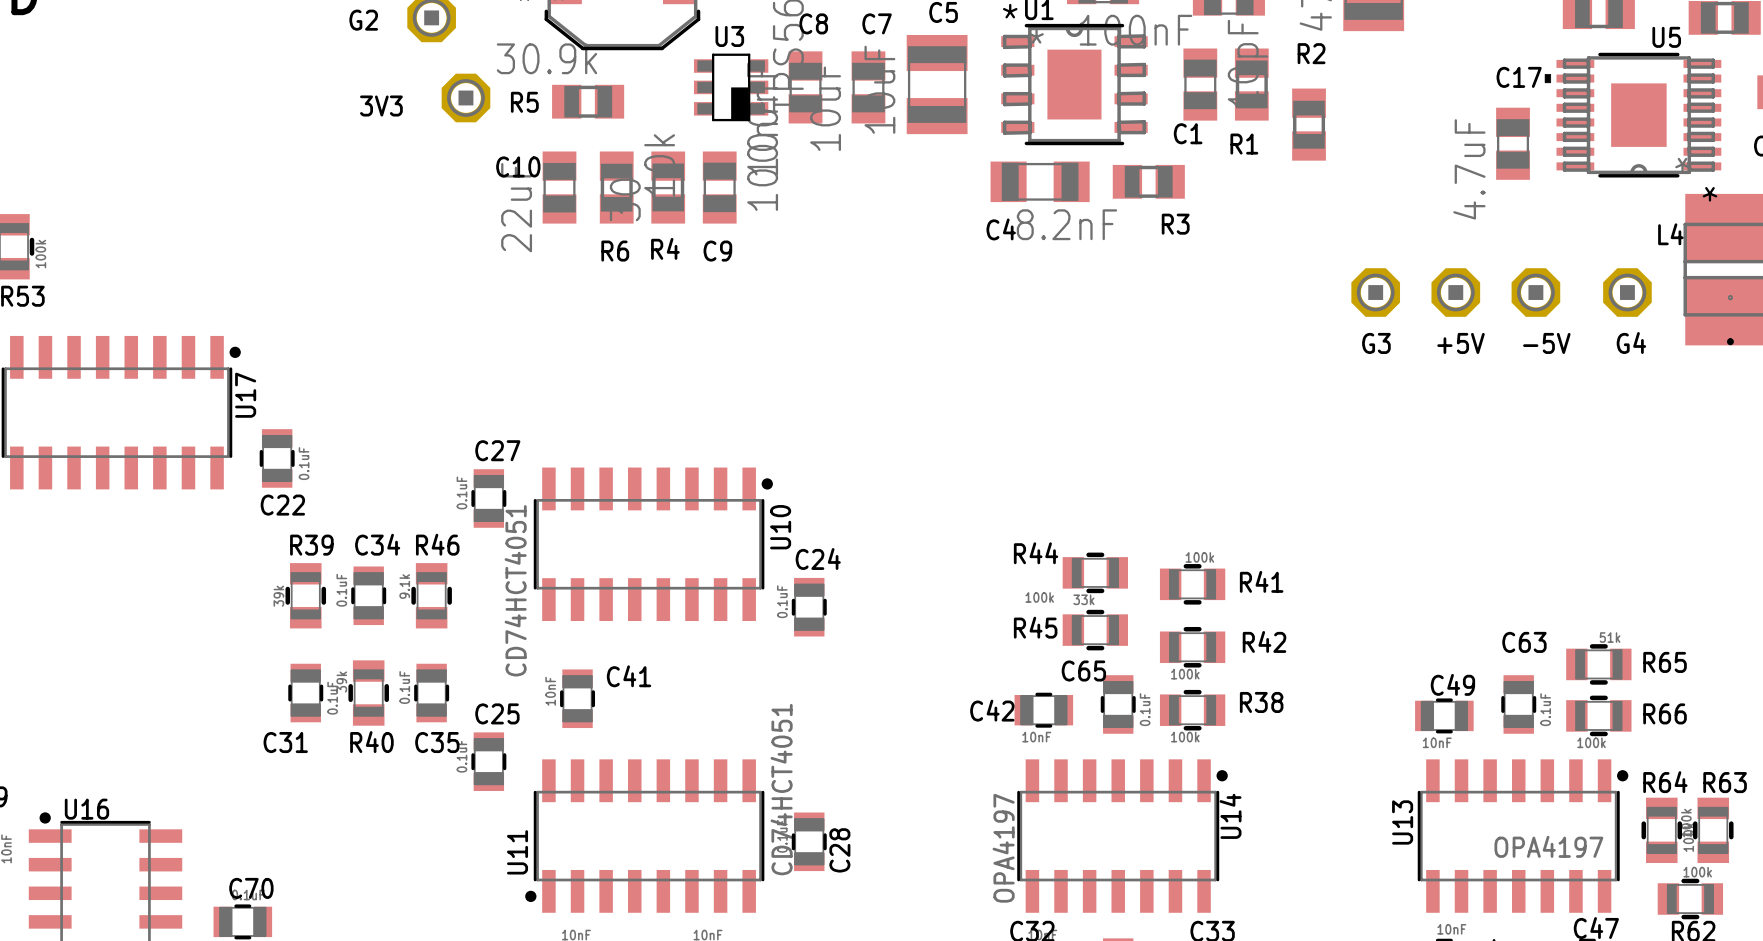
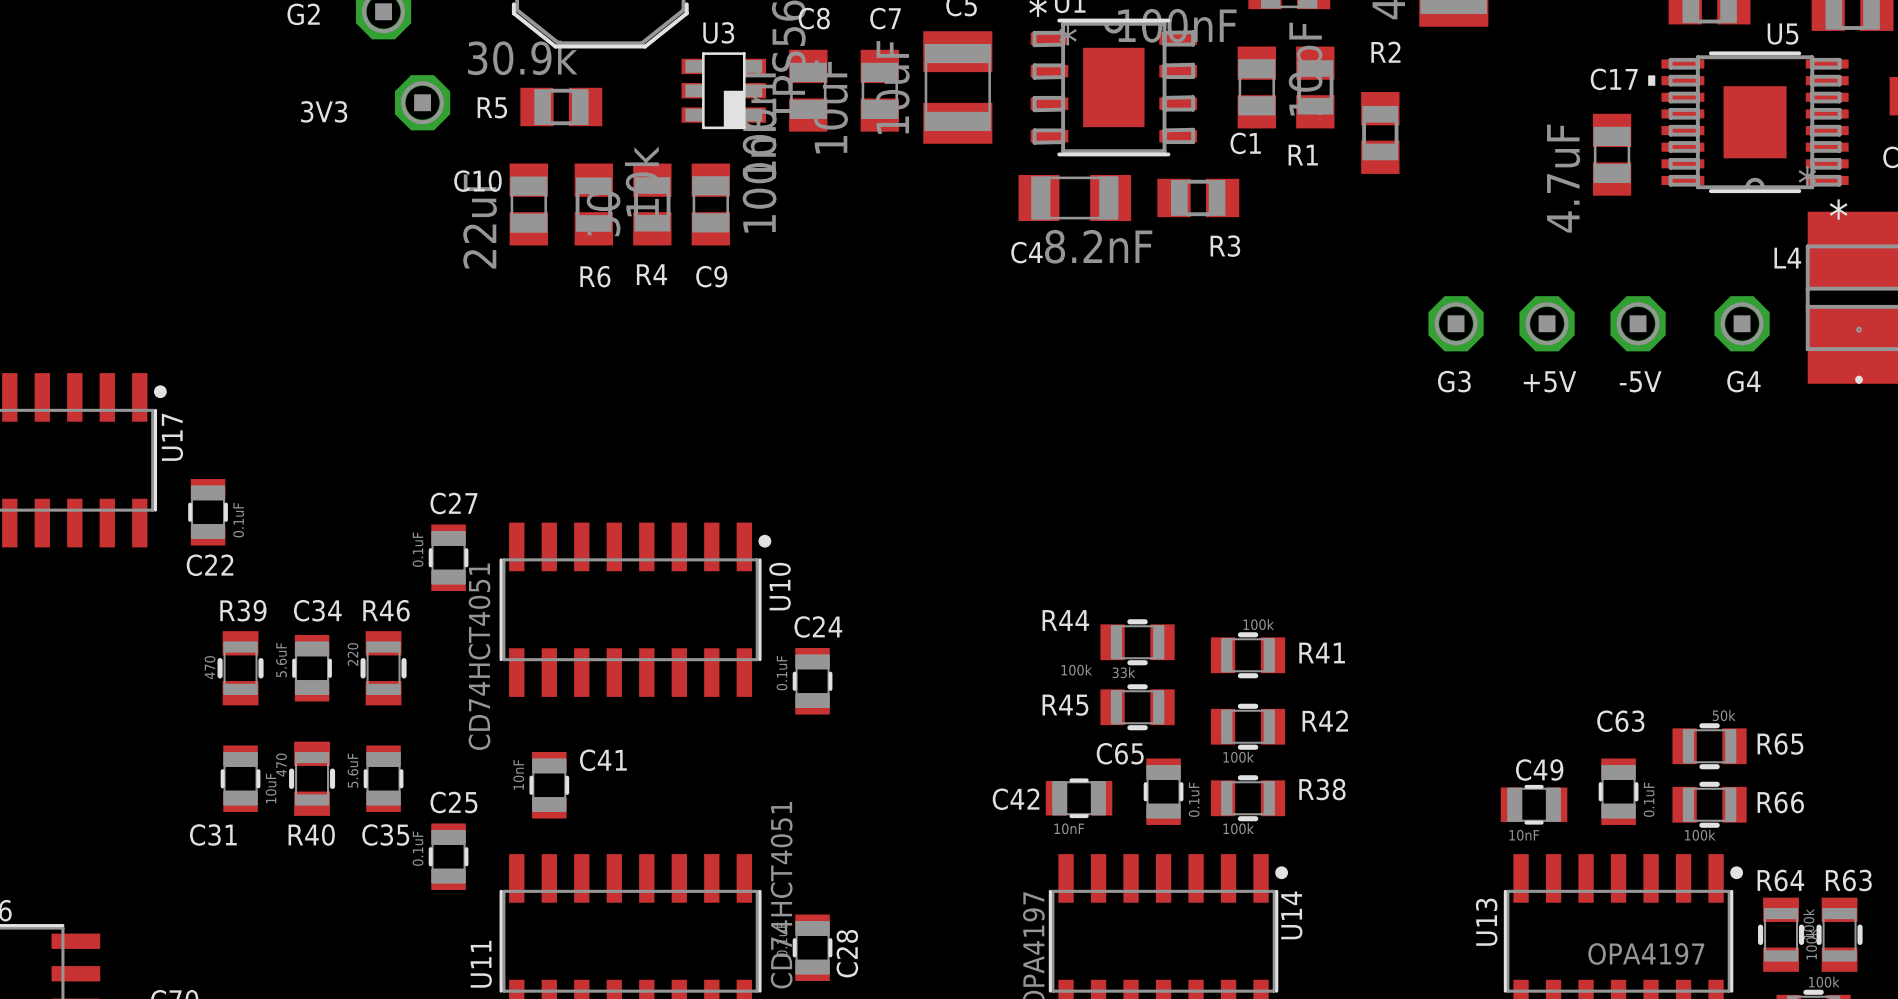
R46 value: 9.1k (404, 586) -> 220 (353, 654)
C34 value: 0.1uF (341, 590) -> 5.6uF (281, 660)
R39 value: 39k (278, 596) -> 470 (210, 667)
R65 value: 51k (1610, 637) -> 50k (1724, 715)
R40 value: 39k (341, 682) -> 470 (281, 765)
C35 value: 0.1uF (404, 687) -> 5.6uF (353, 770)
C31 value: 0.1uF (332, 698) -> 10uF (271, 788)

